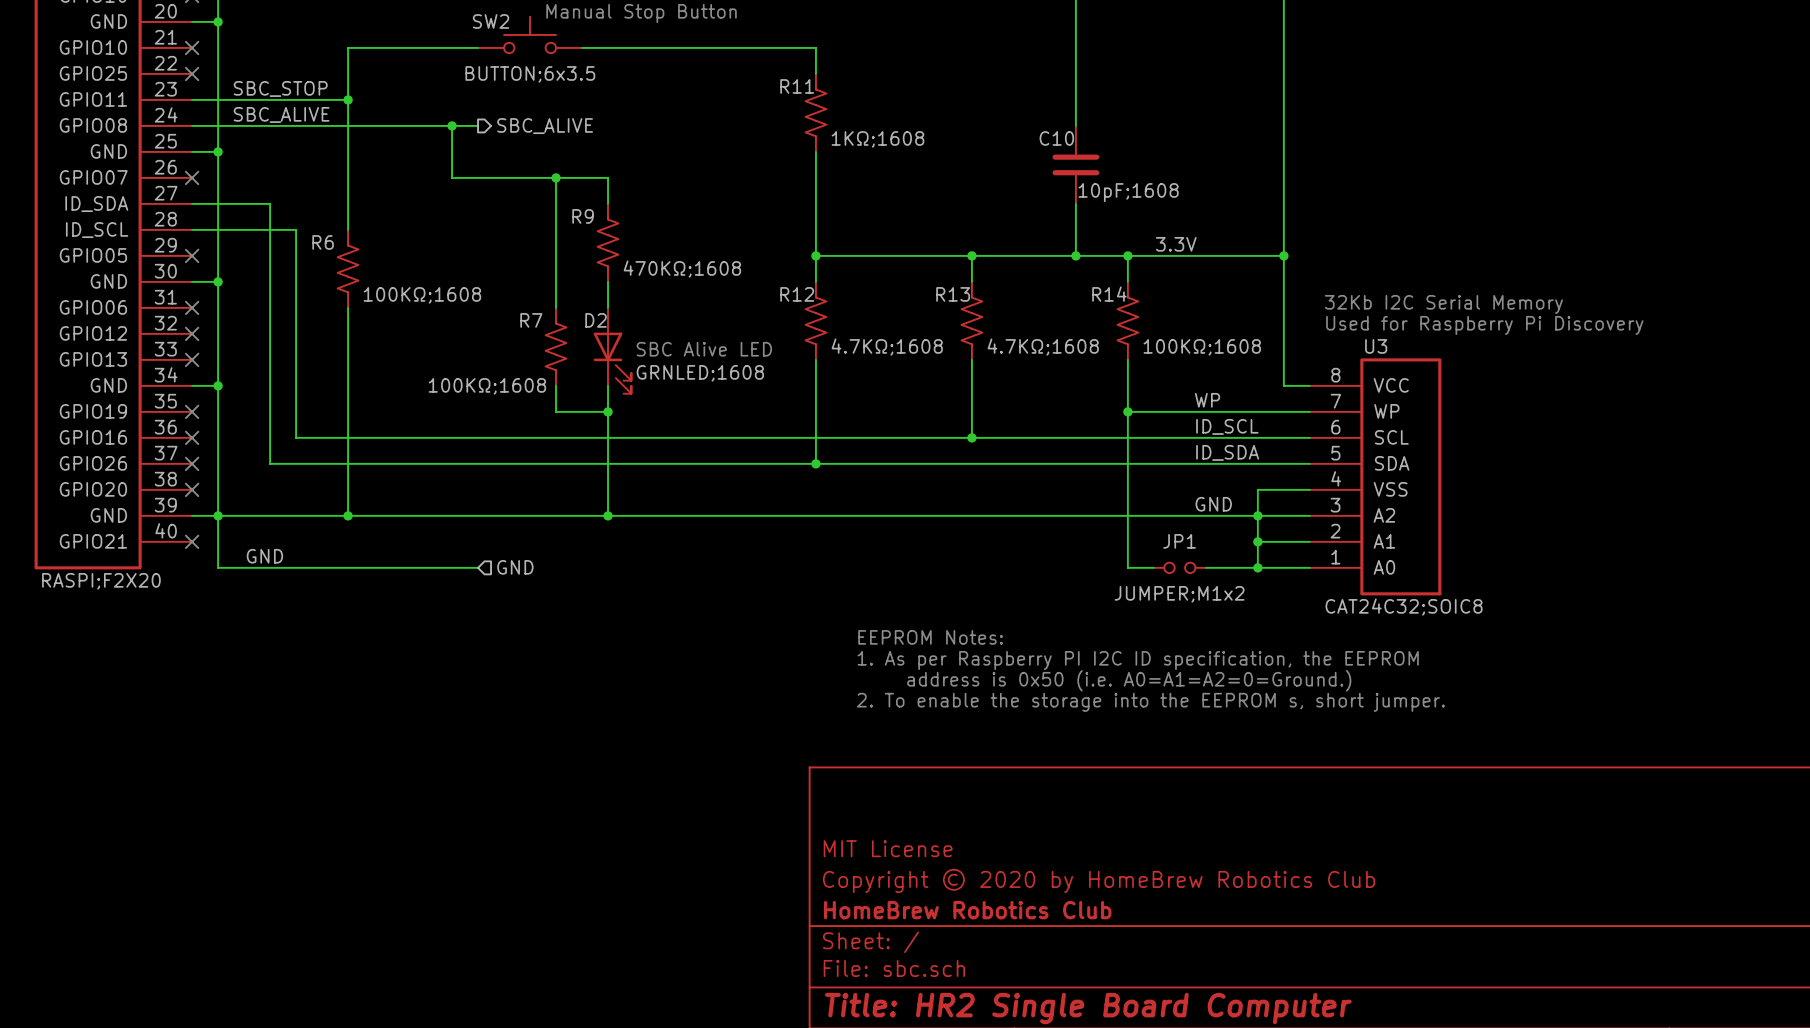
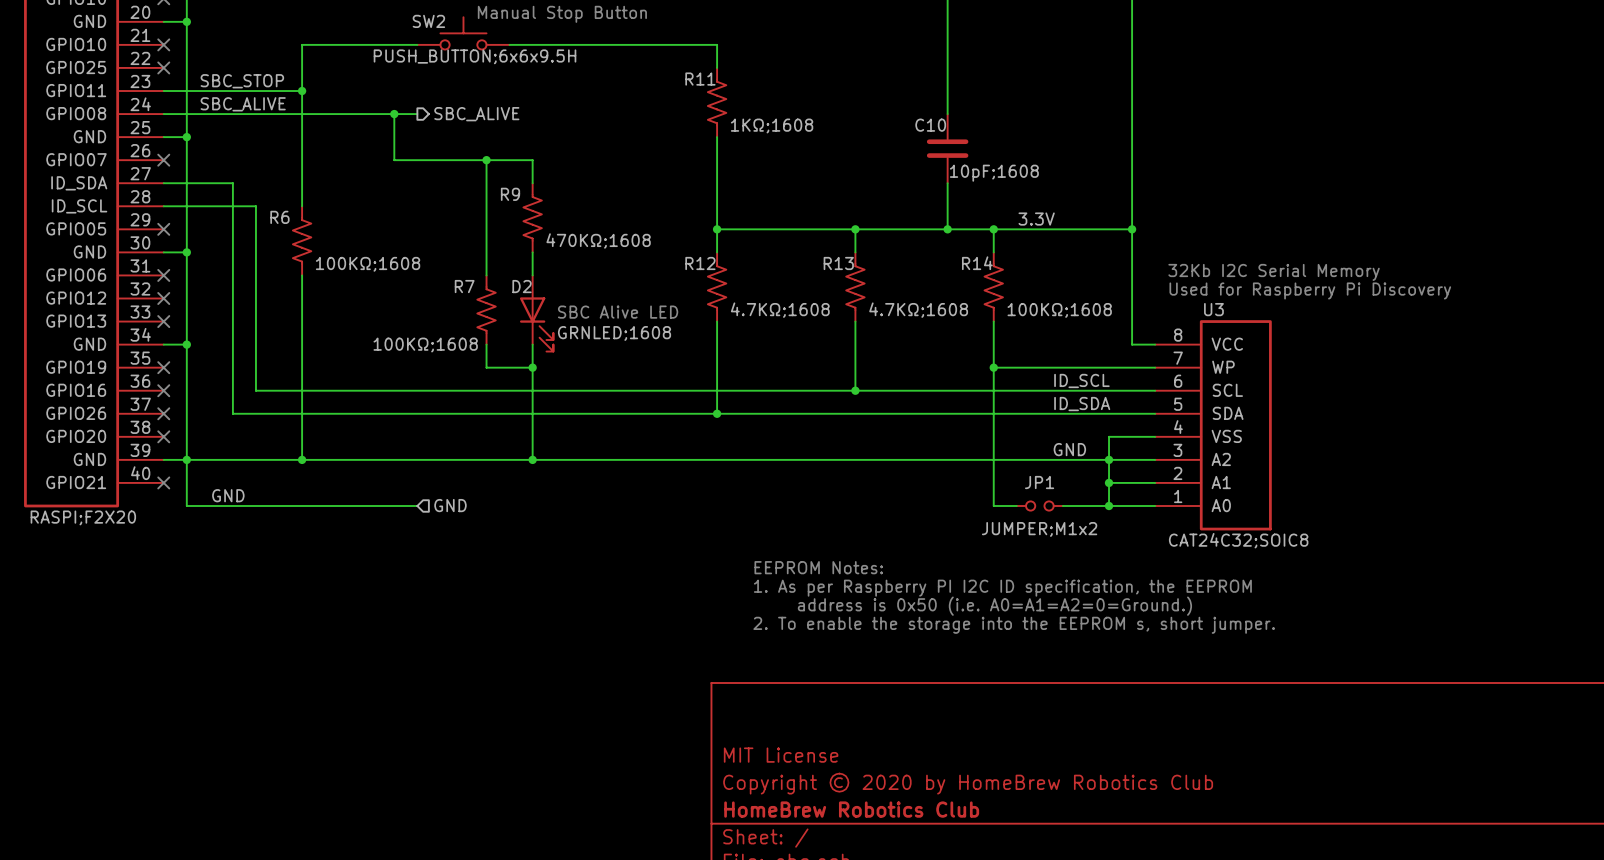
SW2 value: BUTTON;6x3.5 (530, 74) -> PUSH_BUTTON;6x6x9.5H (475, 56)
label: WP (1207, 400) -> none

